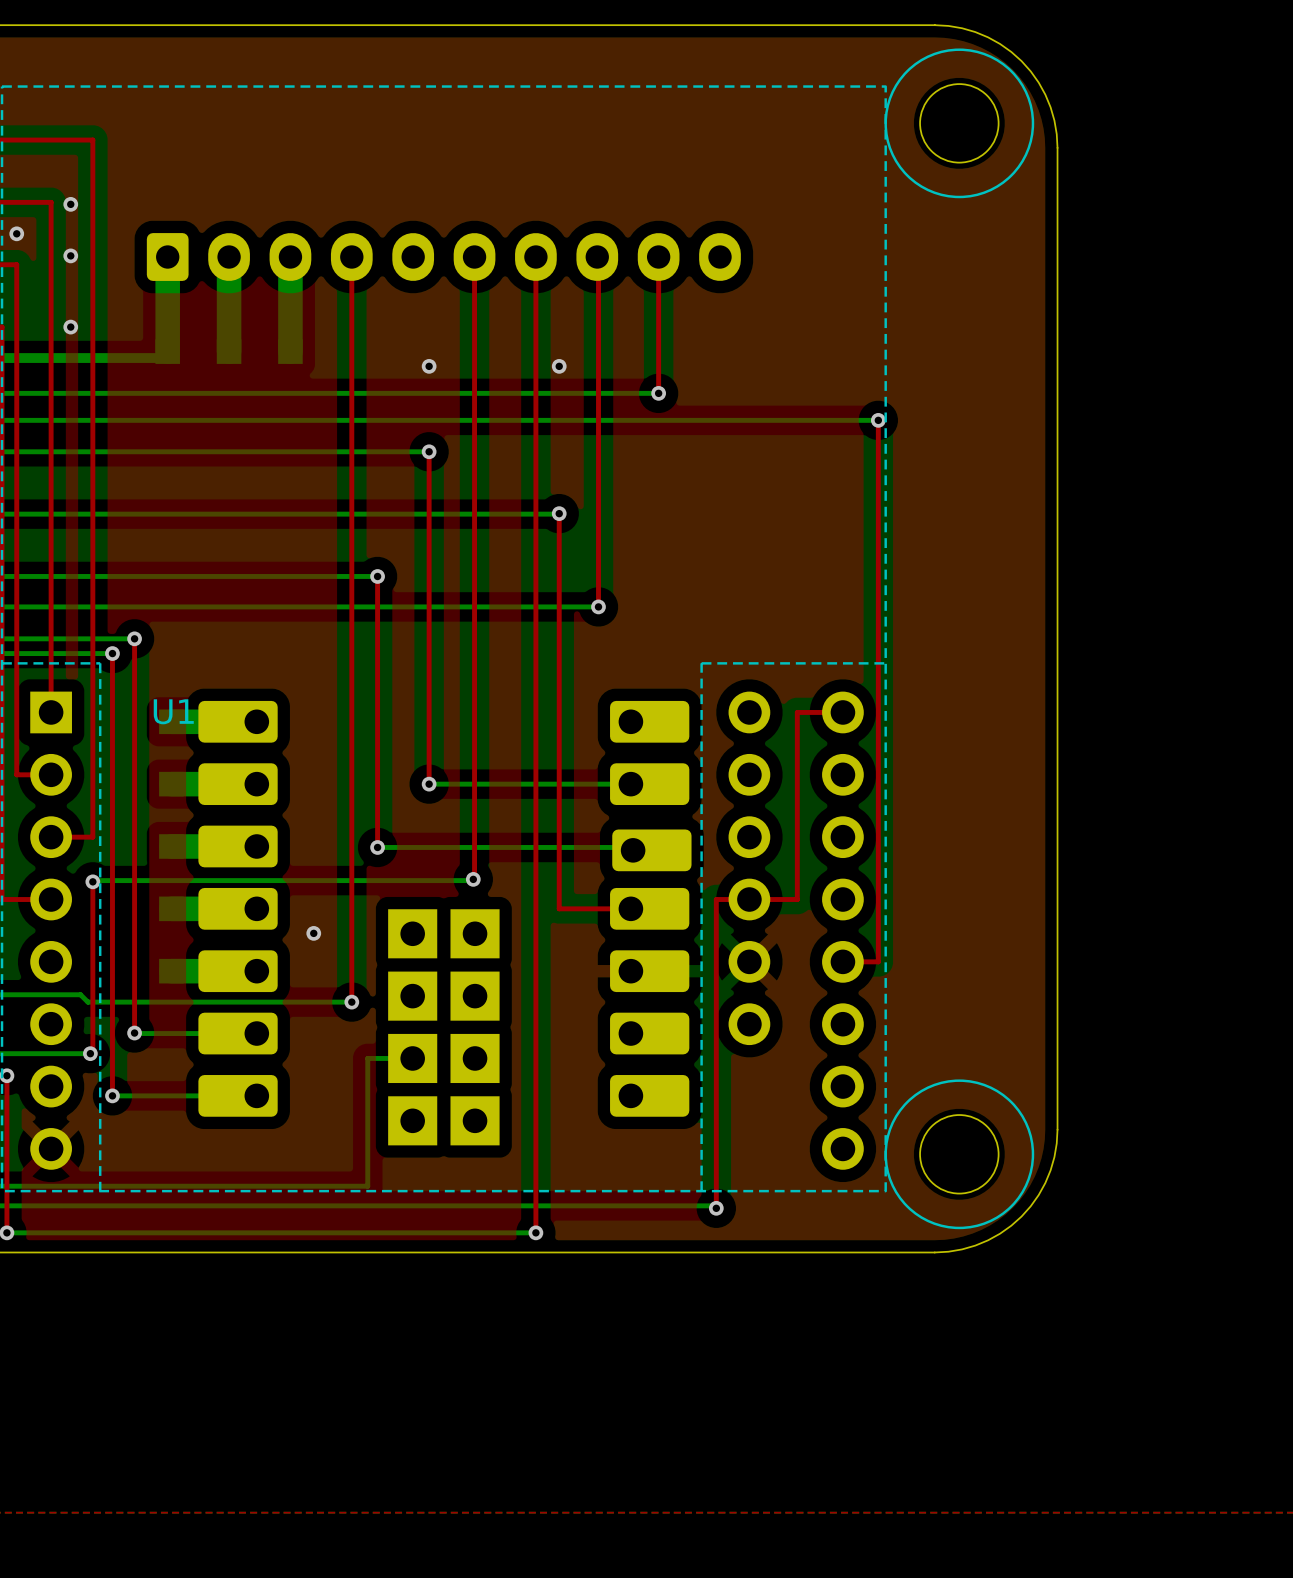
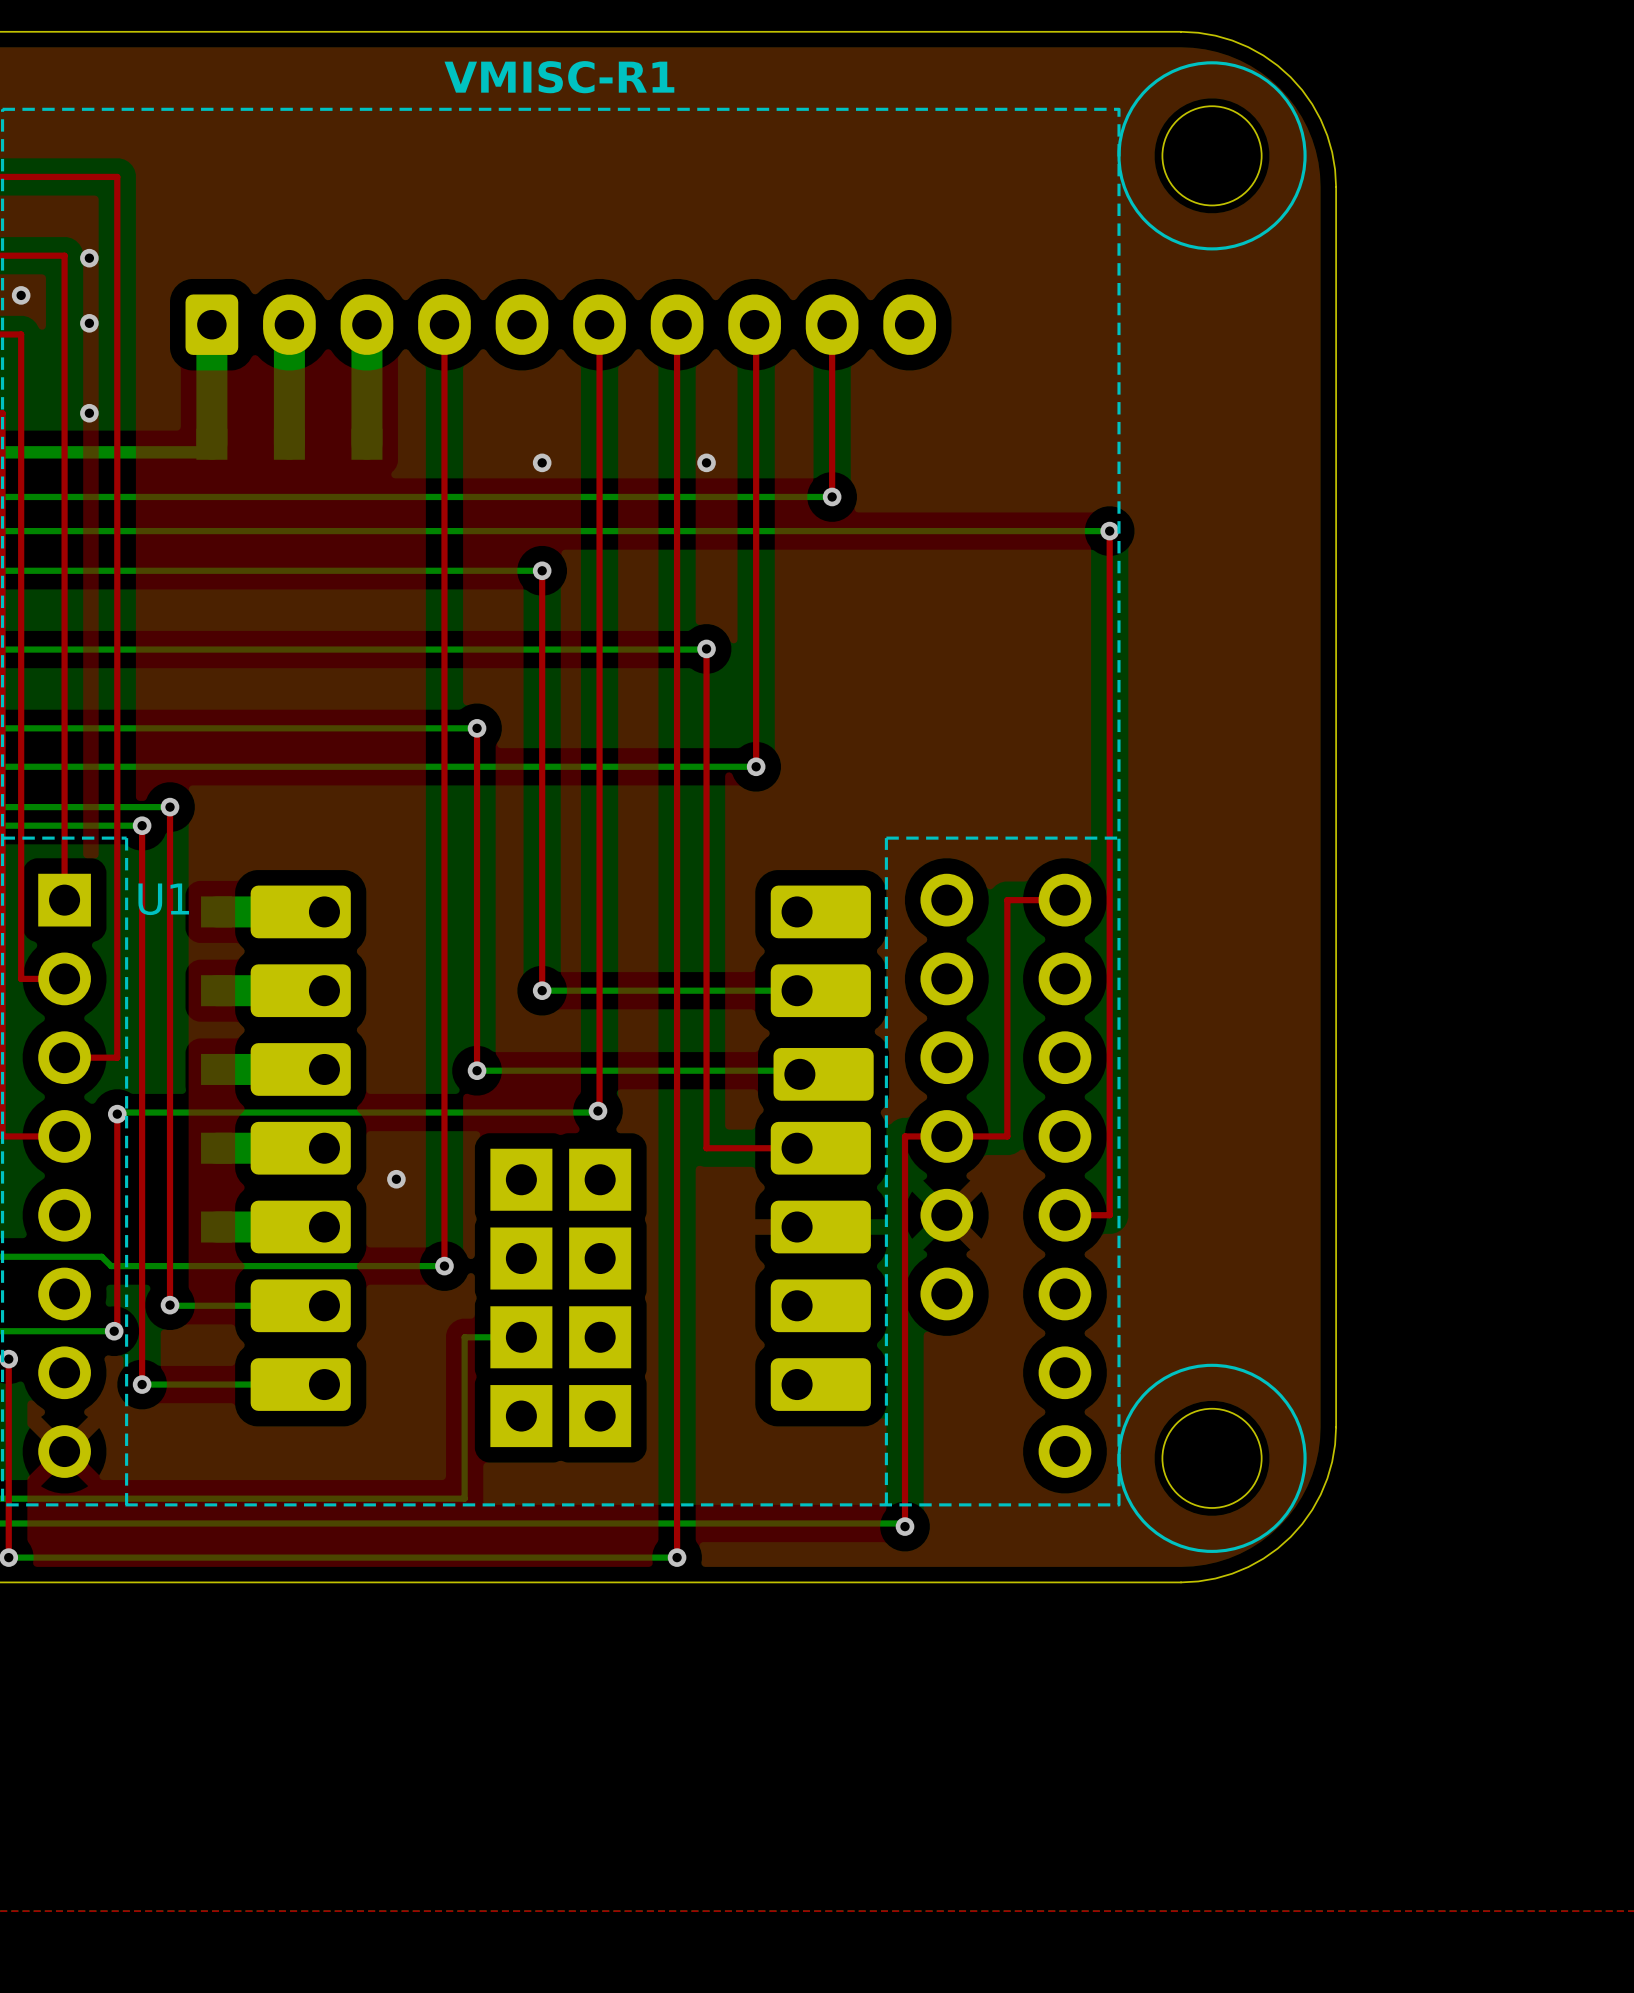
text: none -> VMISC-R1 (559, 77)
U1 name position: U1 (173, 711) -> U1 (163, 899)

